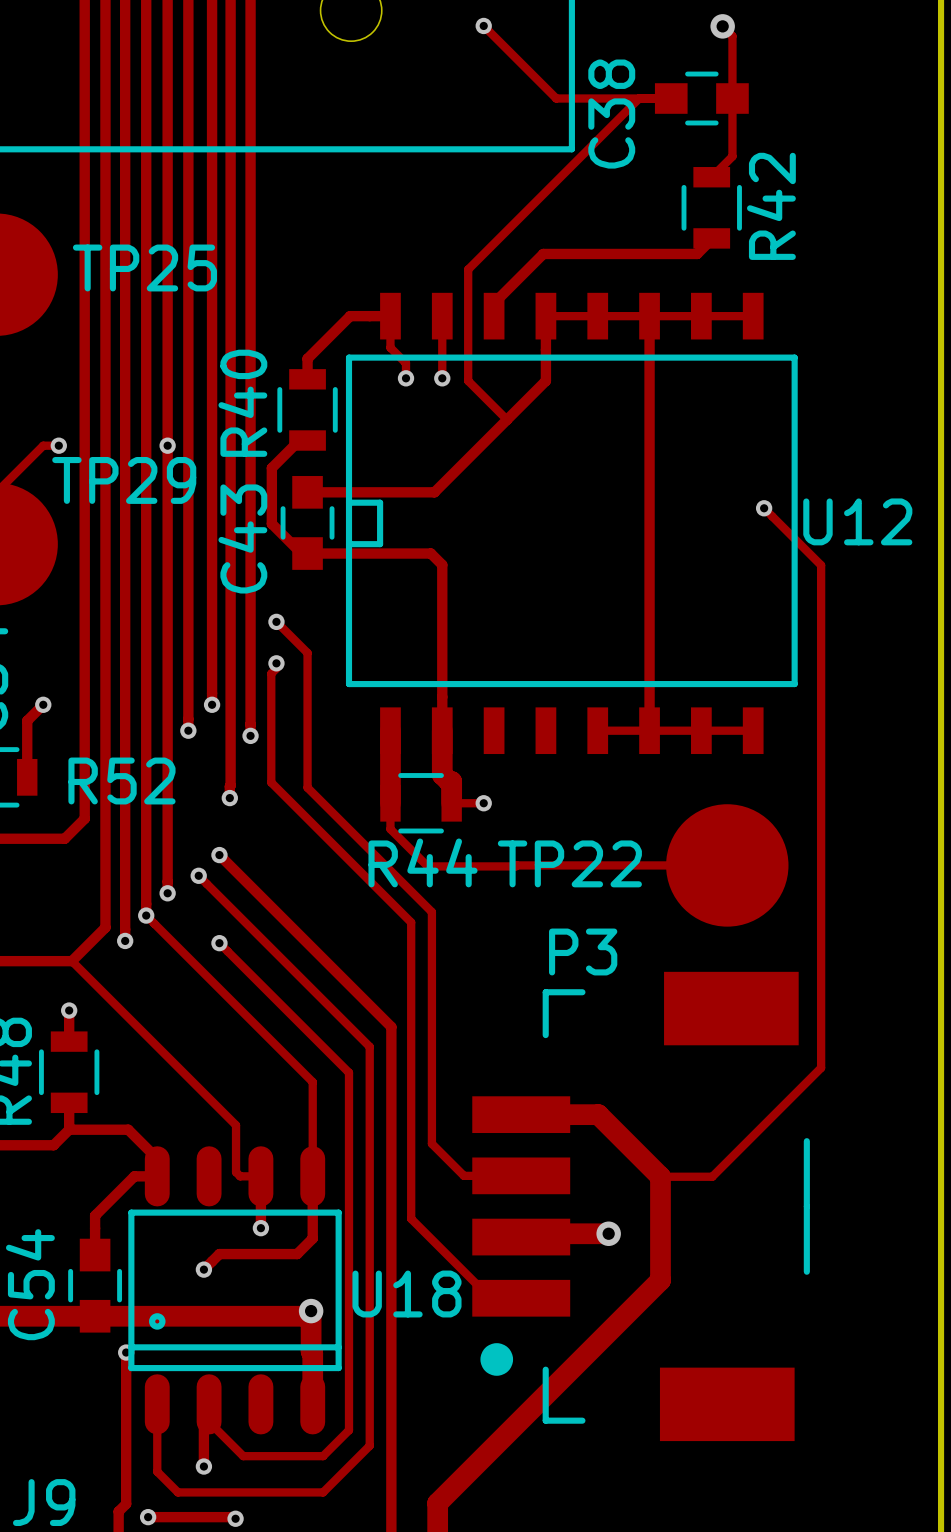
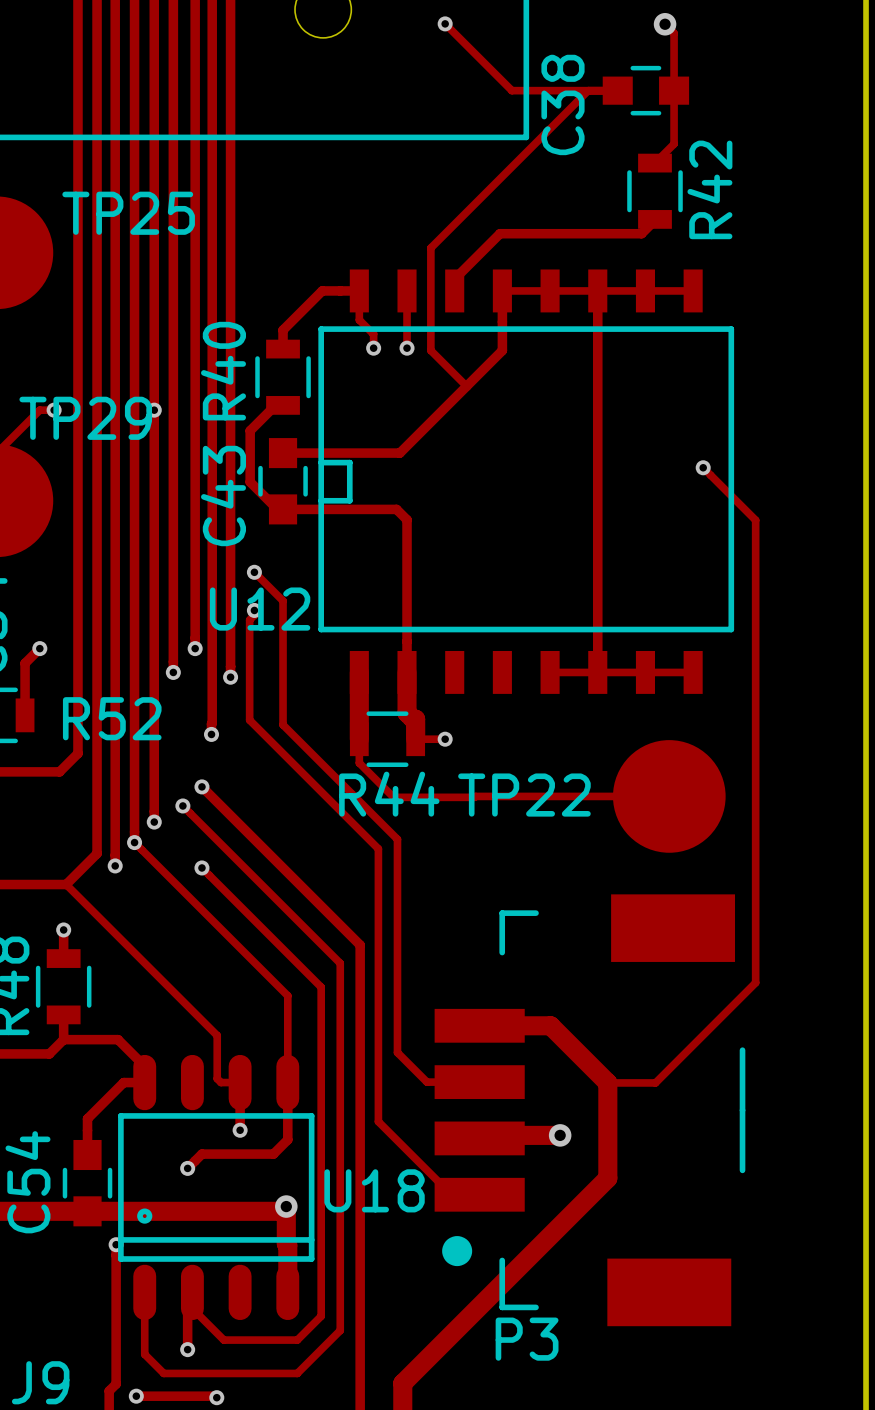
TP25 name position: TP25 (144, 267) -> TP25 (128, 213)
TP29 name position: TP29 (124, 480) -> TP29 (85, 418)
U12 name position: U12 (857, 521) -> U12 (260, 609)
P3 name position: P3 (583, 952) -> P3 (527, 1339)

